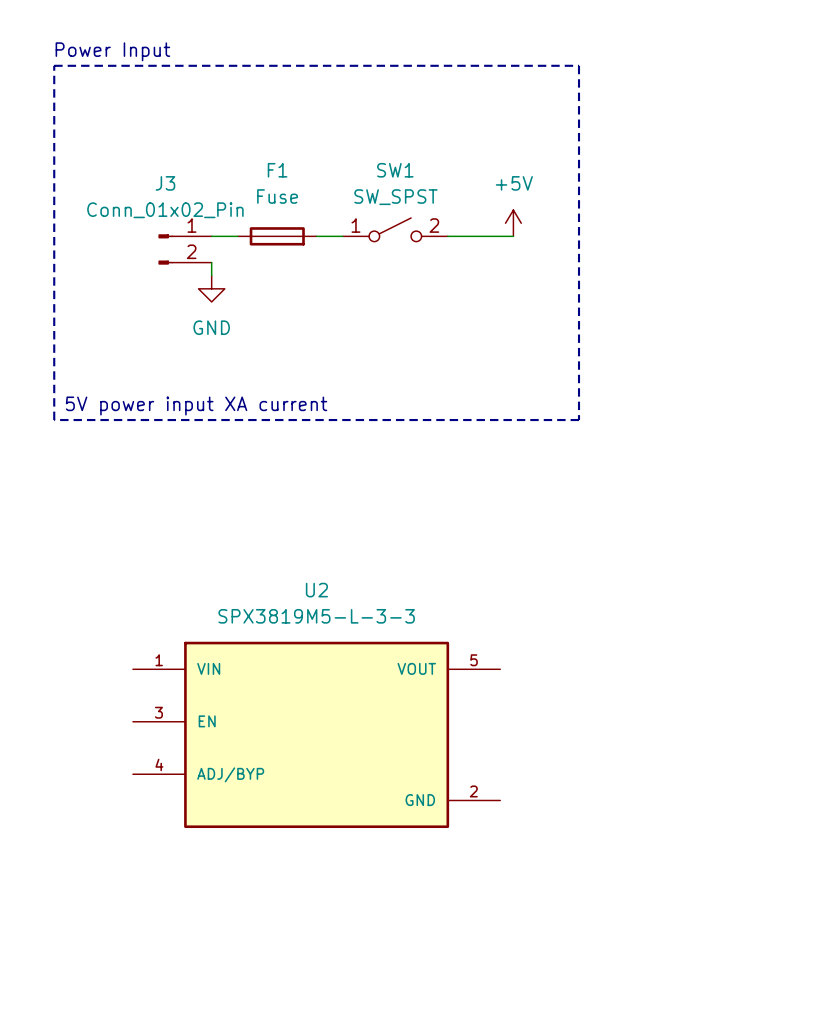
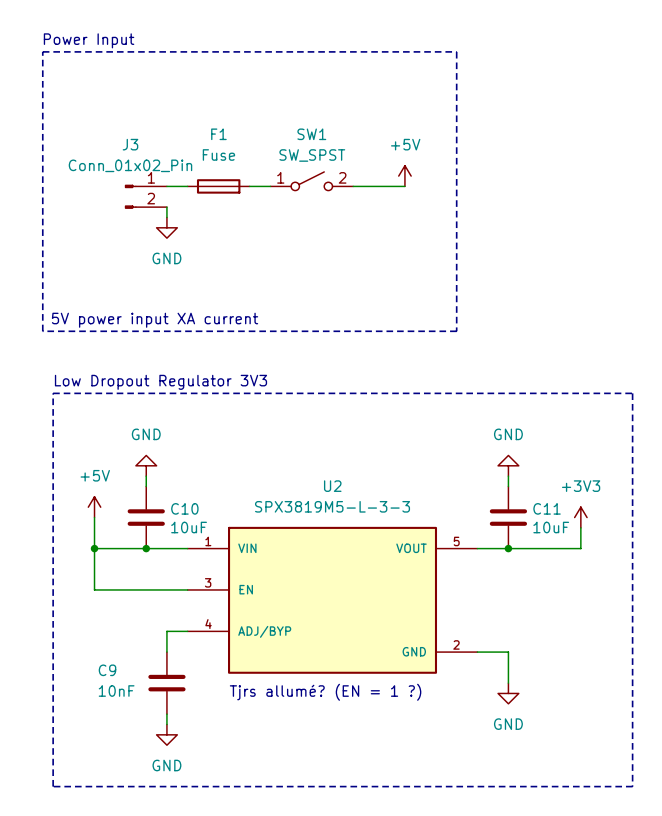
text: none -> Low Dropout Regulator 3V3 (160, 382)
line: none -> (53, 393) (632, 393) (632, 786) (53, 786) (53, 393)
power symbol: none -> GND (146, 465)
power symbol: none -> GND (508, 465)
wire: none -> (146, 476) (146, 486)
wire: none -> (508, 476) (508, 486)
power symbol: none -> +5V (94, 507)
wire: none -> (94, 517) (94, 589) (187, 589)
C10: none -> 10uF (146, 517)
C11: none -> 10uF (508, 517)
power symbol: none -> +3V3 (580, 517)
wire: none -> (580, 527) (580, 548) (477, 548)
wire: none -> (94, 548) (187, 548)
junction: none -> (94, 548)
junction: none -> (146, 548)
junction: none -> (508, 548)
U2 position: (316, 734) -> (332, 600)
wire: none -> (477, 652) (508, 652) (508, 683)
C9: none -> 10nF (166, 683)
text: none -> Tjrs allumé? (EN = 1 ?) (325, 692)
power symbol: none -> GND (508, 693)
wire: none -> (166, 714) (166, 724)
power symbol: none -> GND (166, 734)

